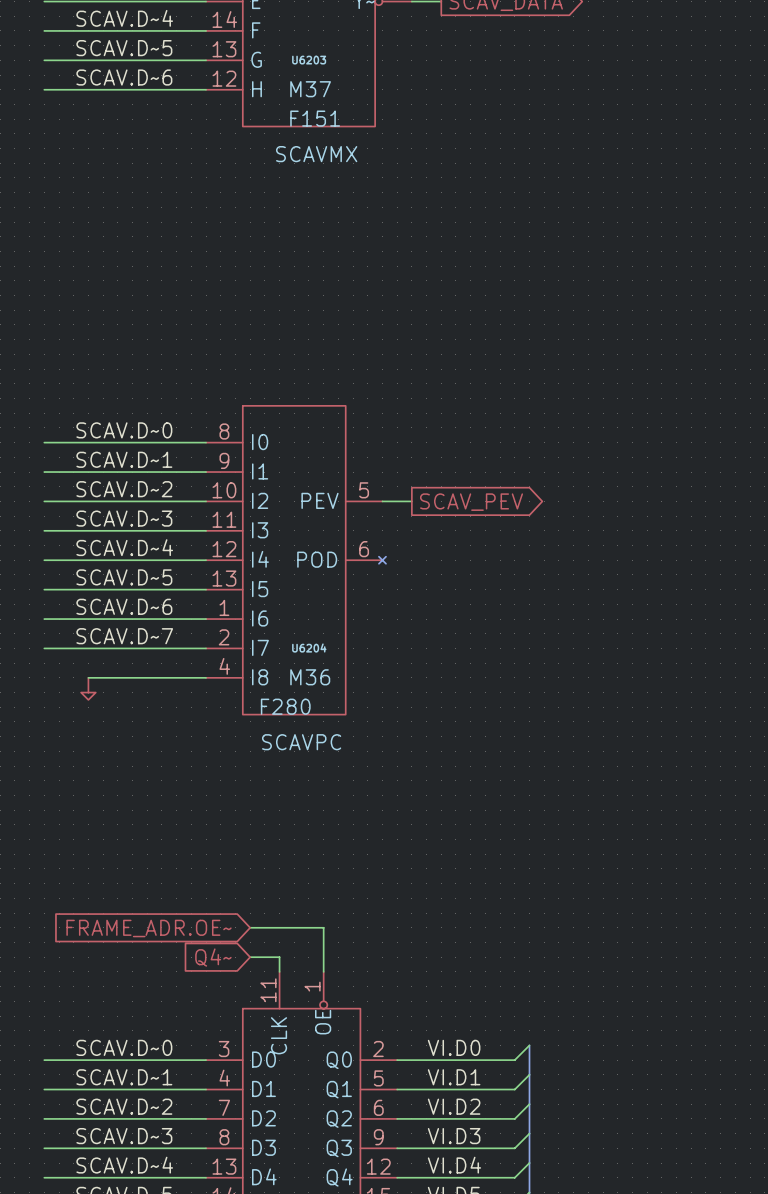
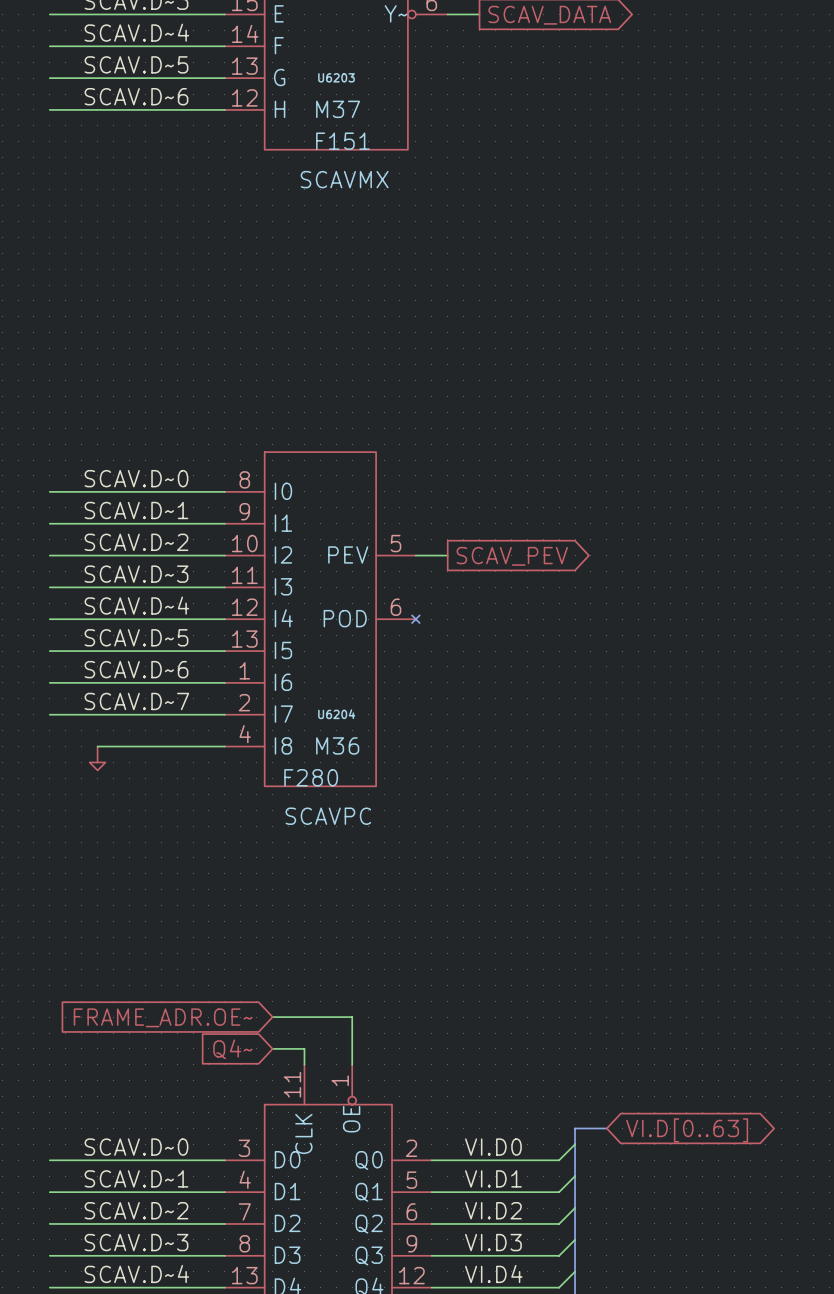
bus: none -> (606, 1128) (575, 1128) (575, 1144)
global label: none -> VI.D[0..63] (687, 1130)

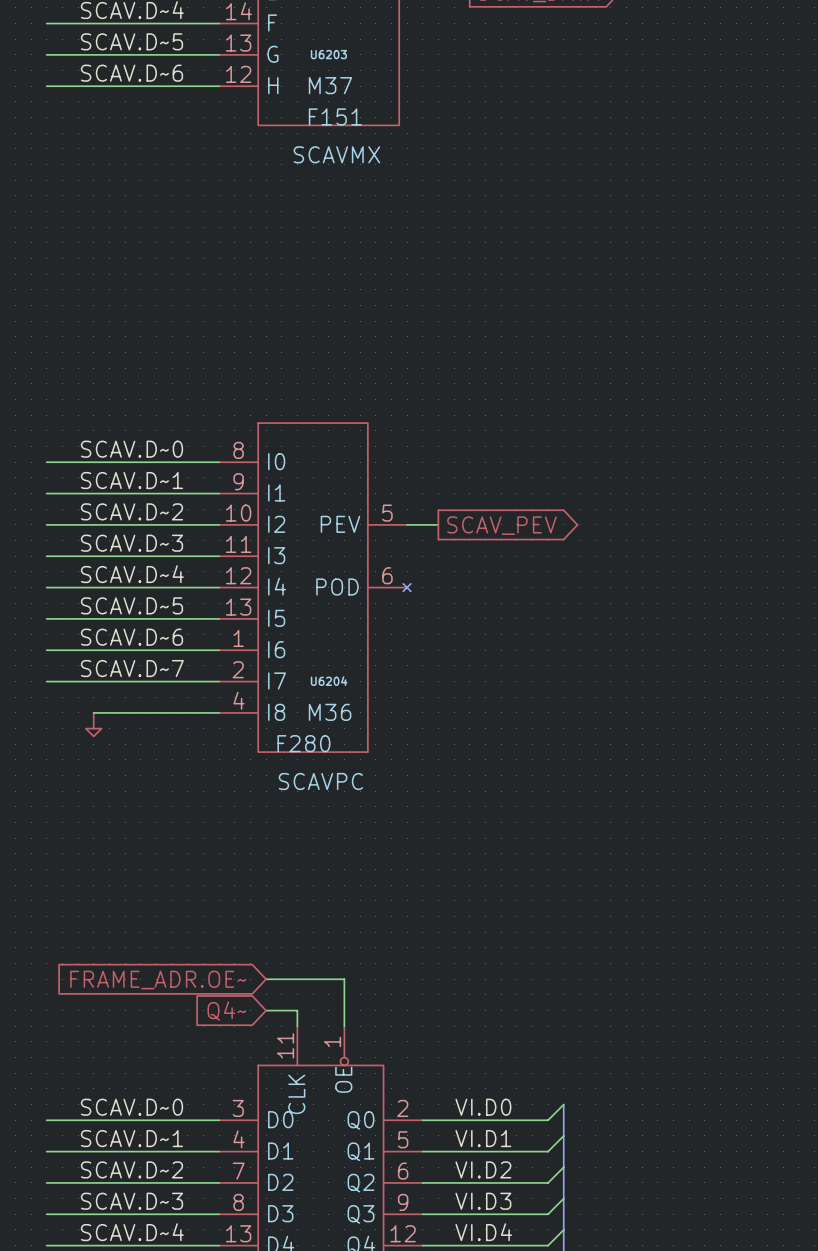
bus: (606, 1128) (575, 1128) (575, 1144) -> none
global label: VI.D[0..63] (687, 1130) -> none

